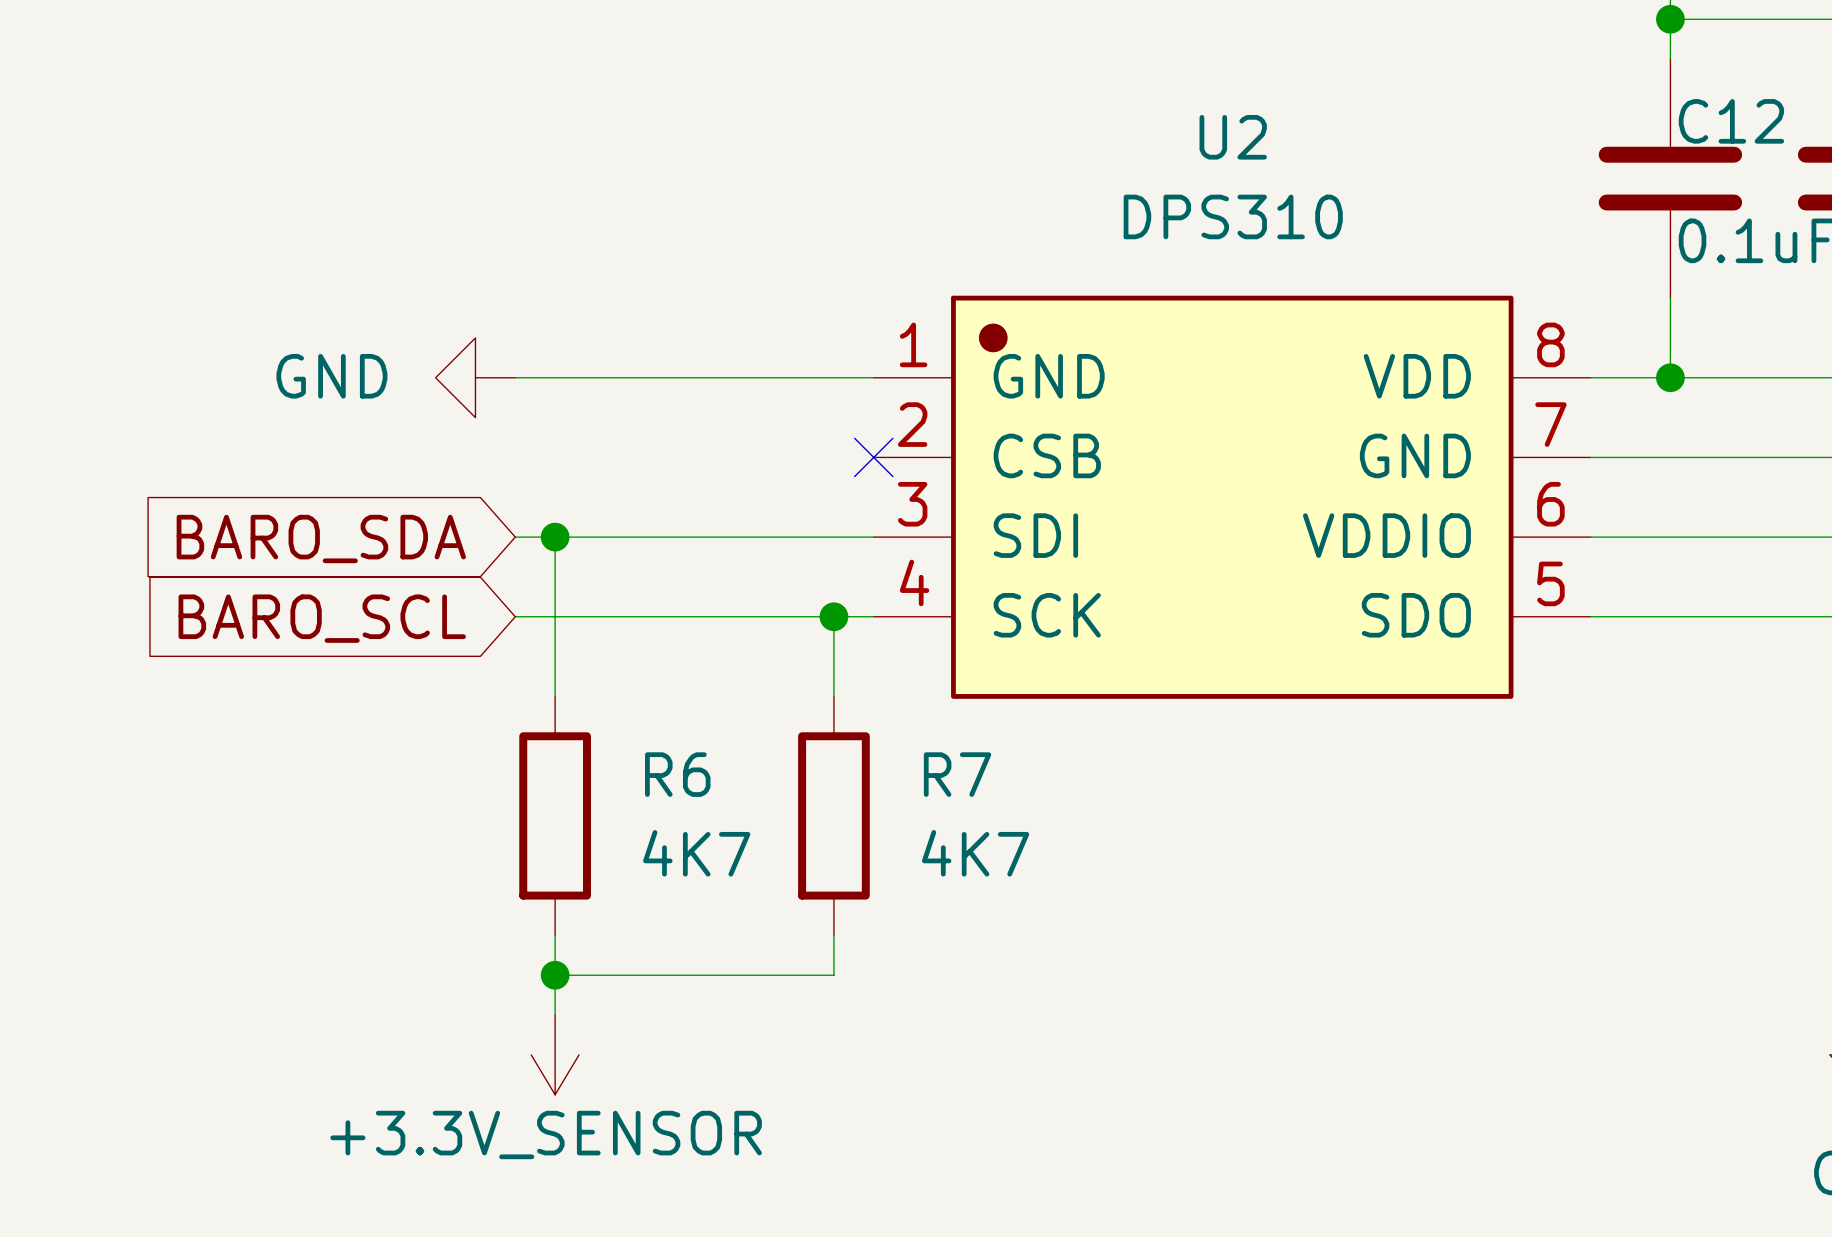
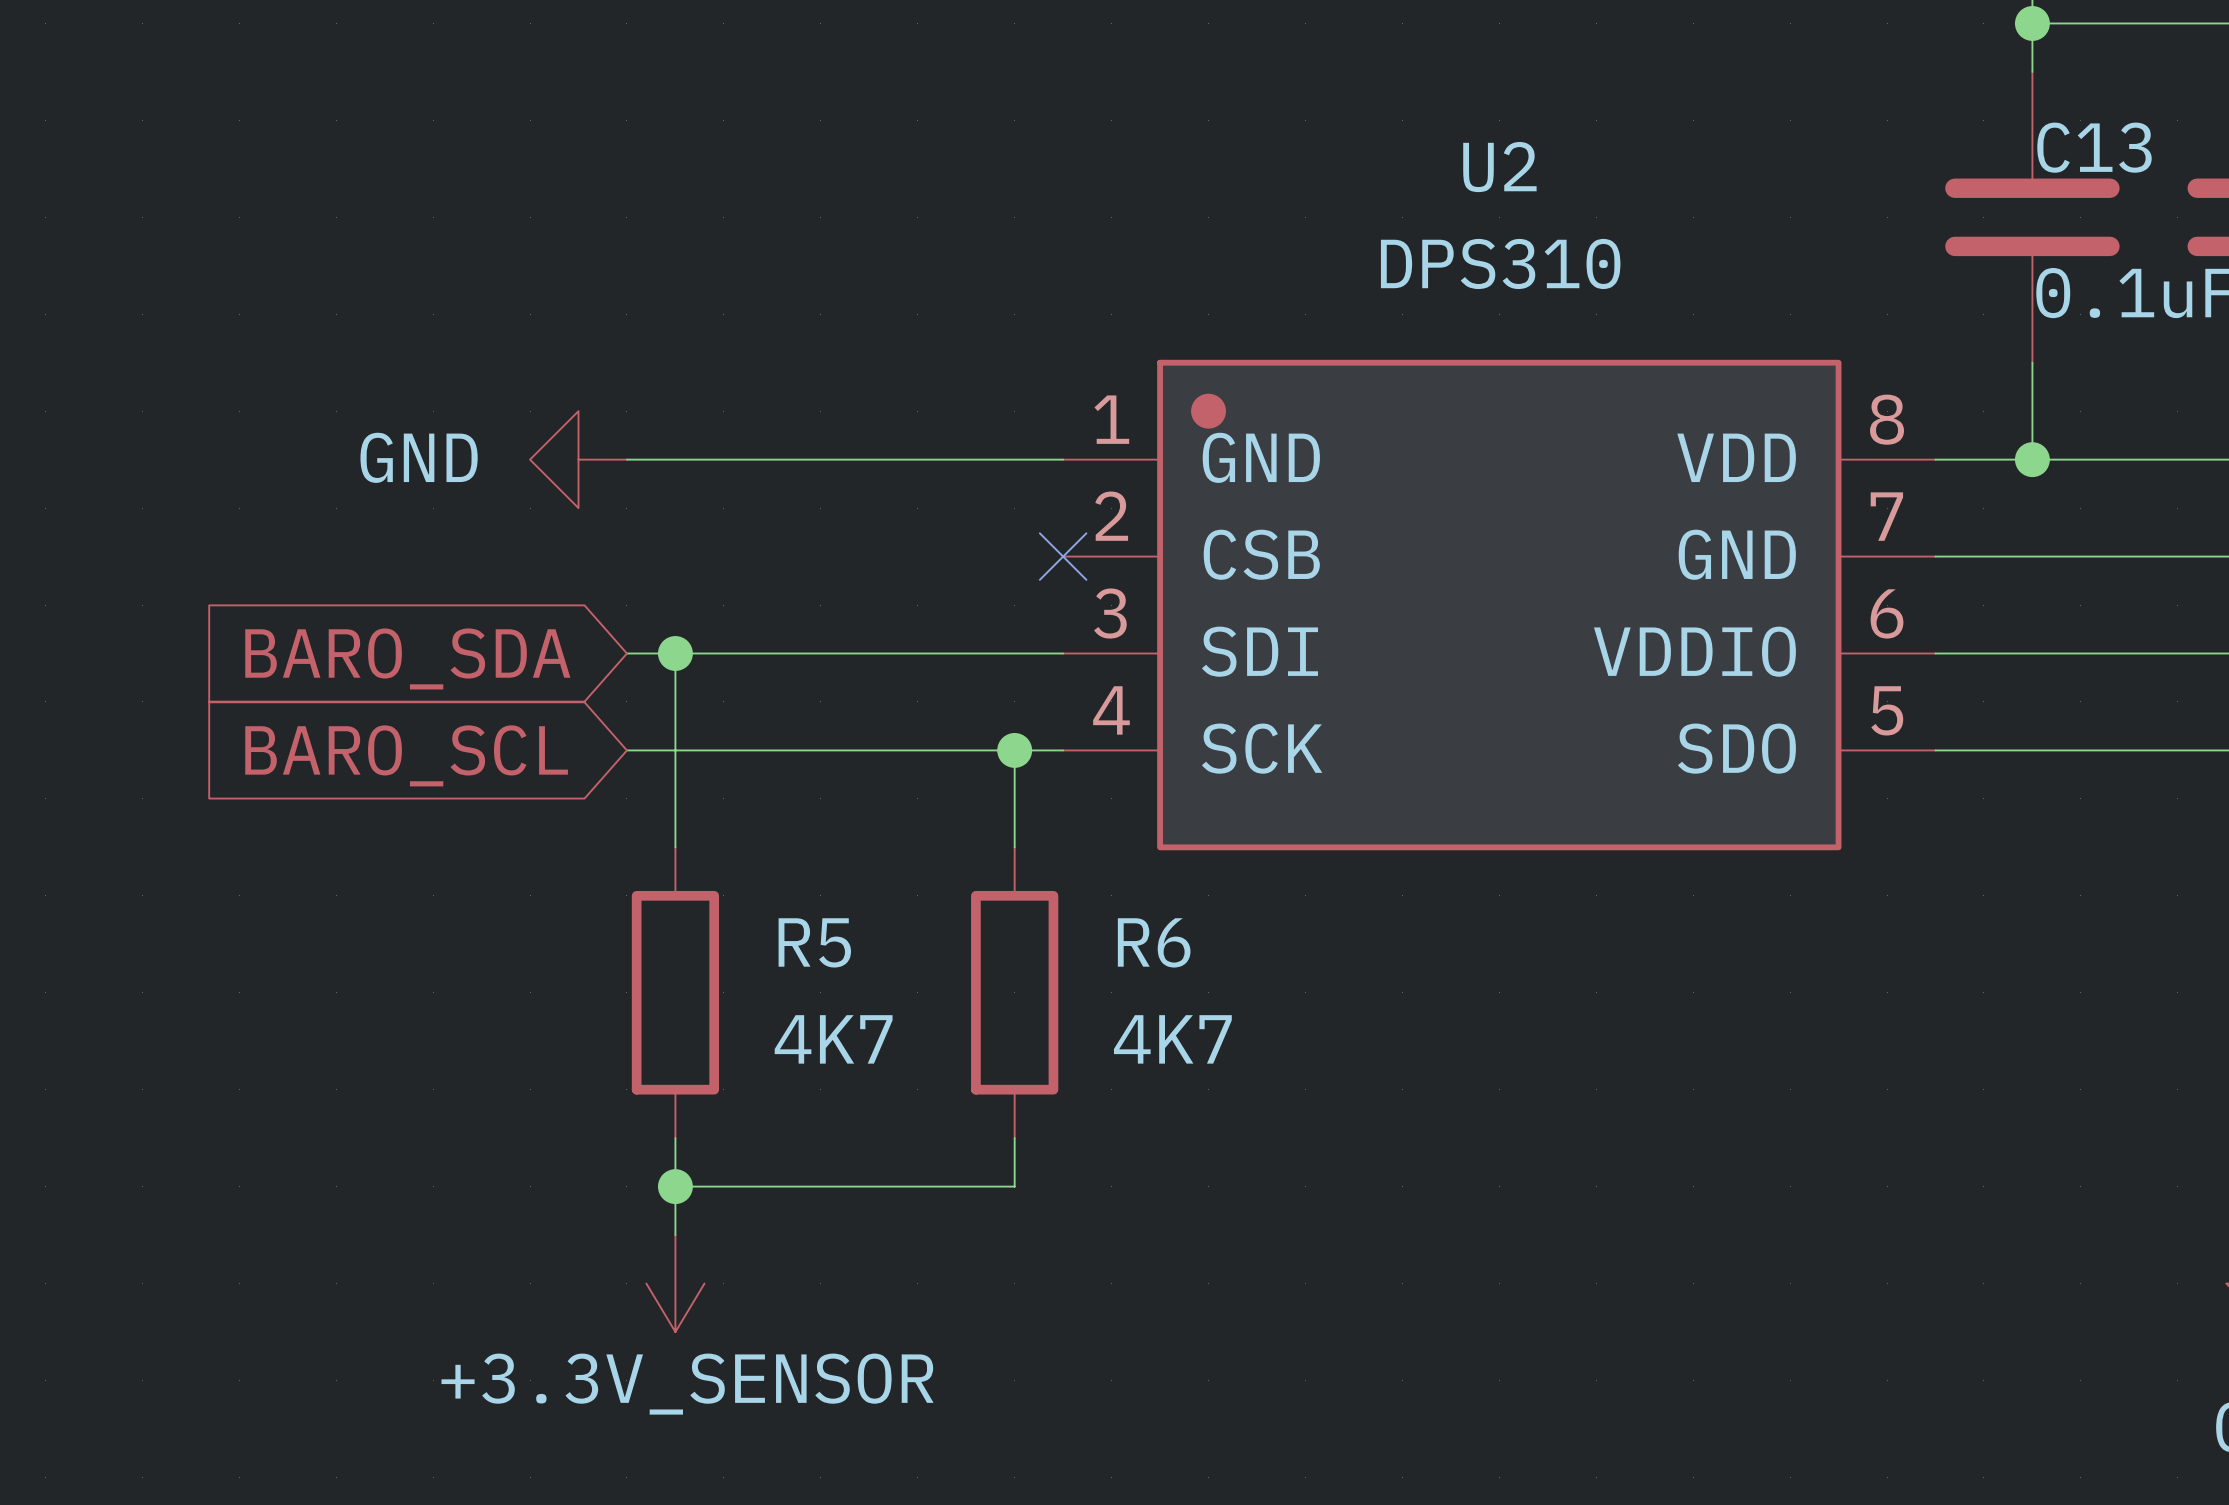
C12 name: C12 (1731, 121) -> C13 (2094, 147)
R6 name: R6 (677, 774) -> R5 (814, 942)
R7 name: R7 (957, 774) -> R6 (1154, 942)

